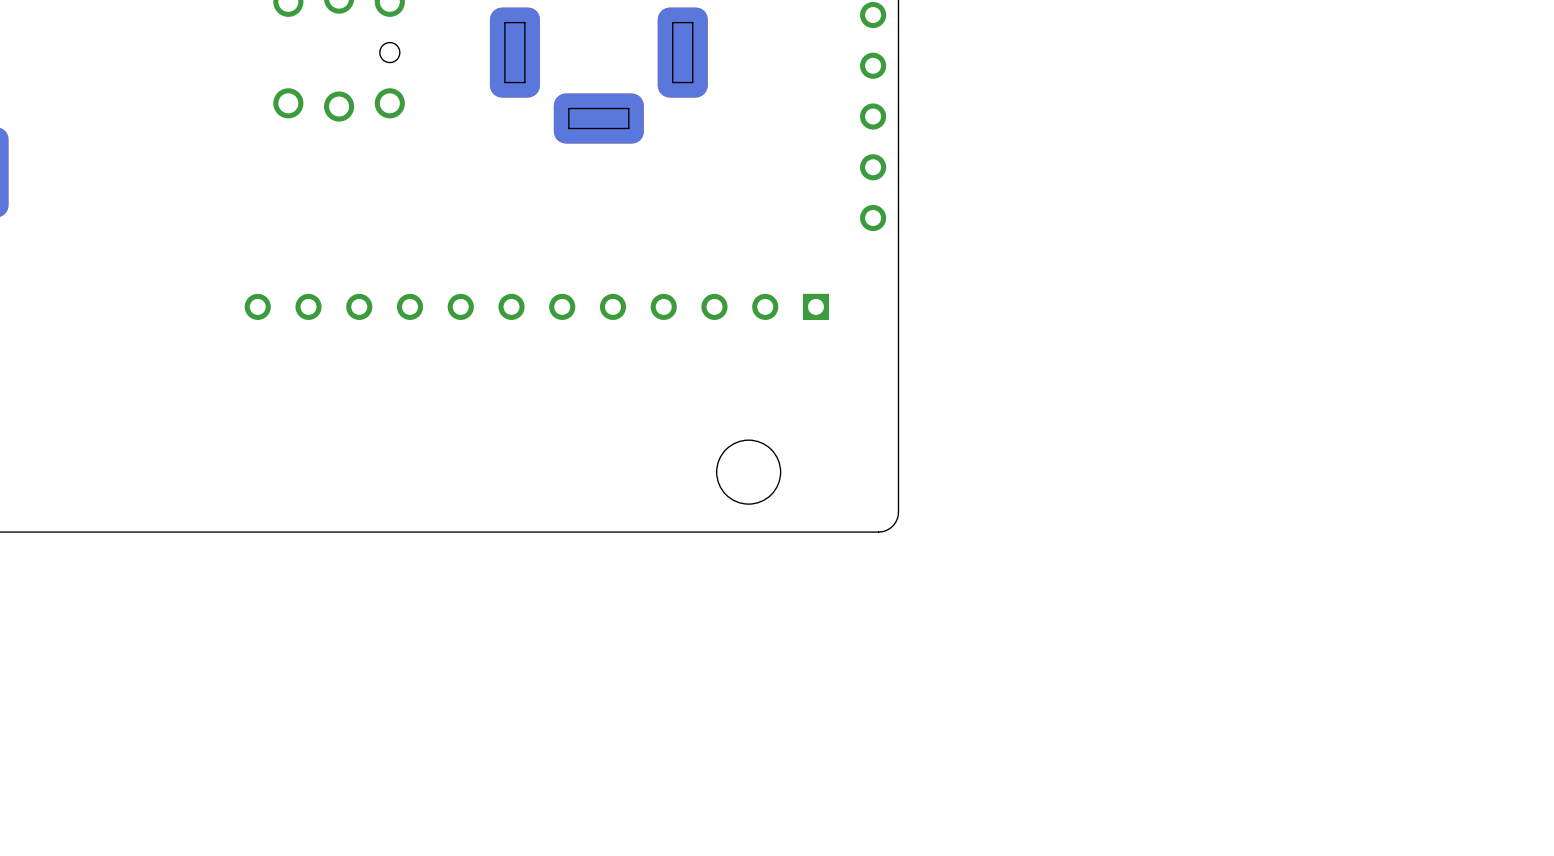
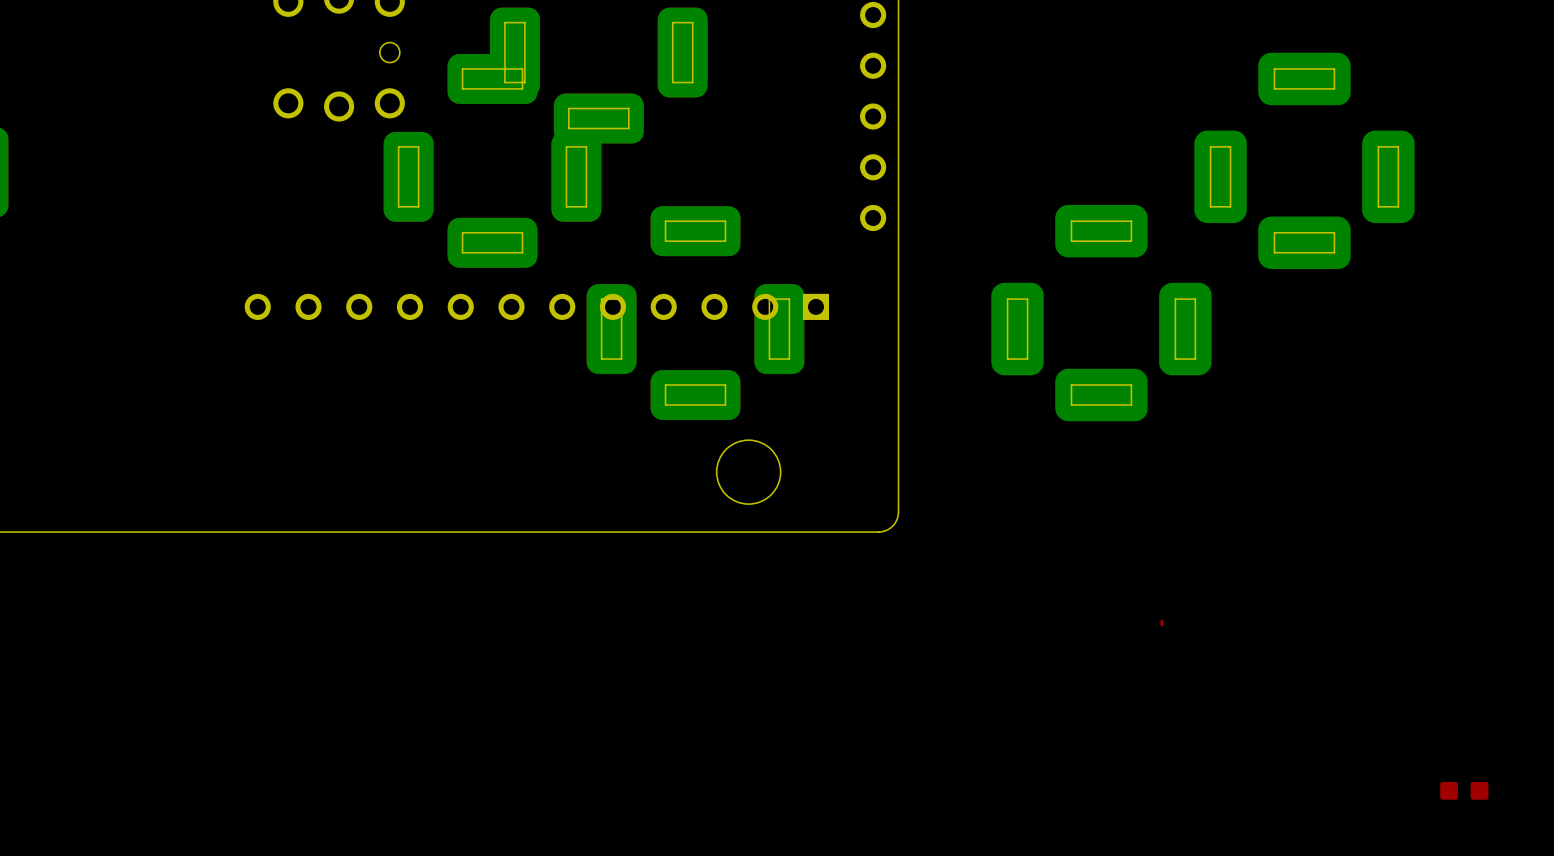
part: none -> (492, 160)
part: none -> (1304, 160)
part: none -> (695, 313)
part: none -> (1101, 313)
top track: none -> (1161, 621) (1161, 624)
part: none -> (1464, 790)

